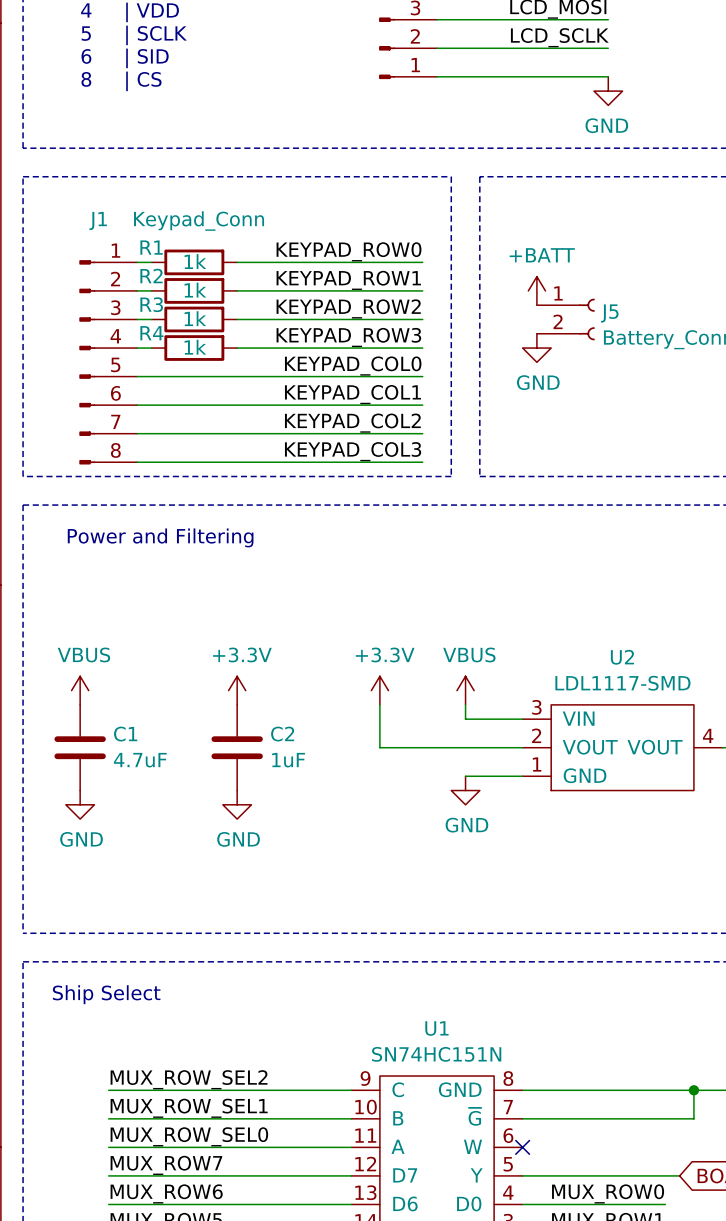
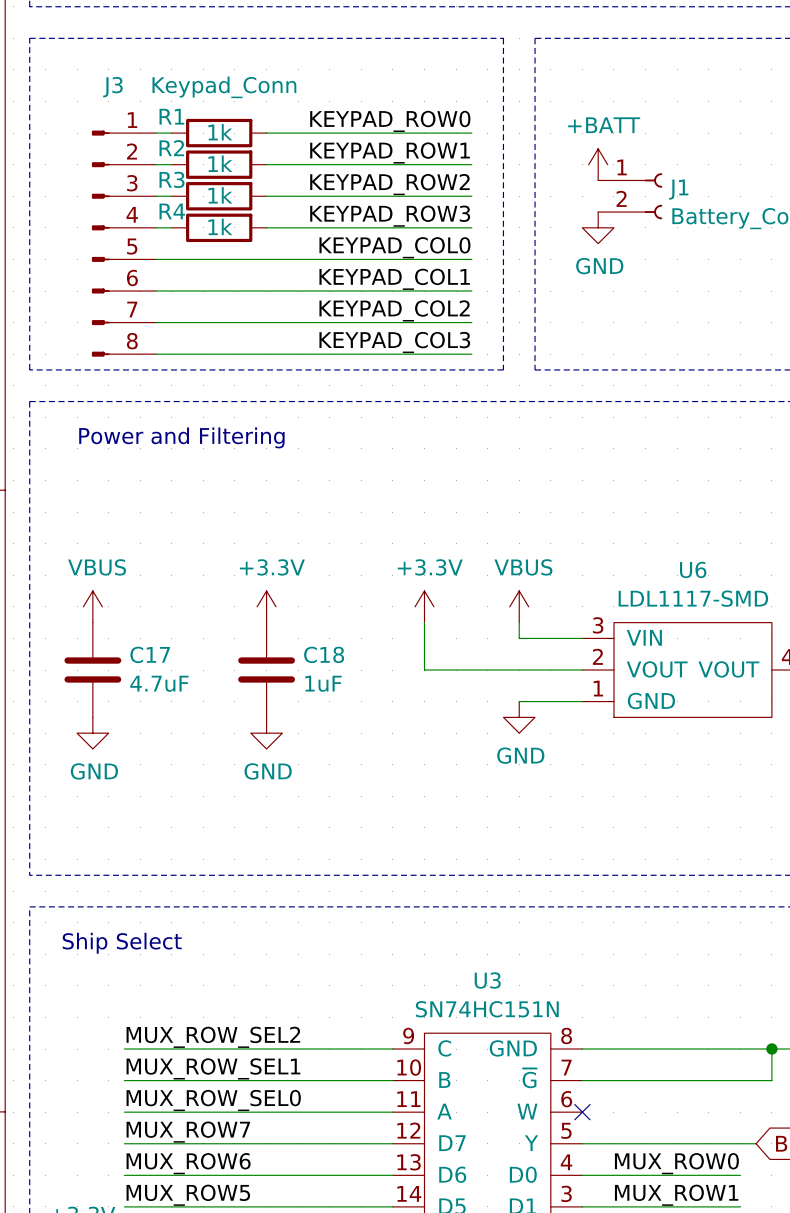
J1 name: J1 (98, 220) -> J3 (112, 87)
J5 name: J5 (609, 313) -> J1 (678, 189)
U2 name: U2 (622, 657) -> U6 (693, 569)
C1 name: C1 (125, 734) -> C17 (150, 654)
C2 name: C2 (282, 734) -> C18 (324, 654)
U1 name: U1 (436, 1028) -> U3 (487, 980)

